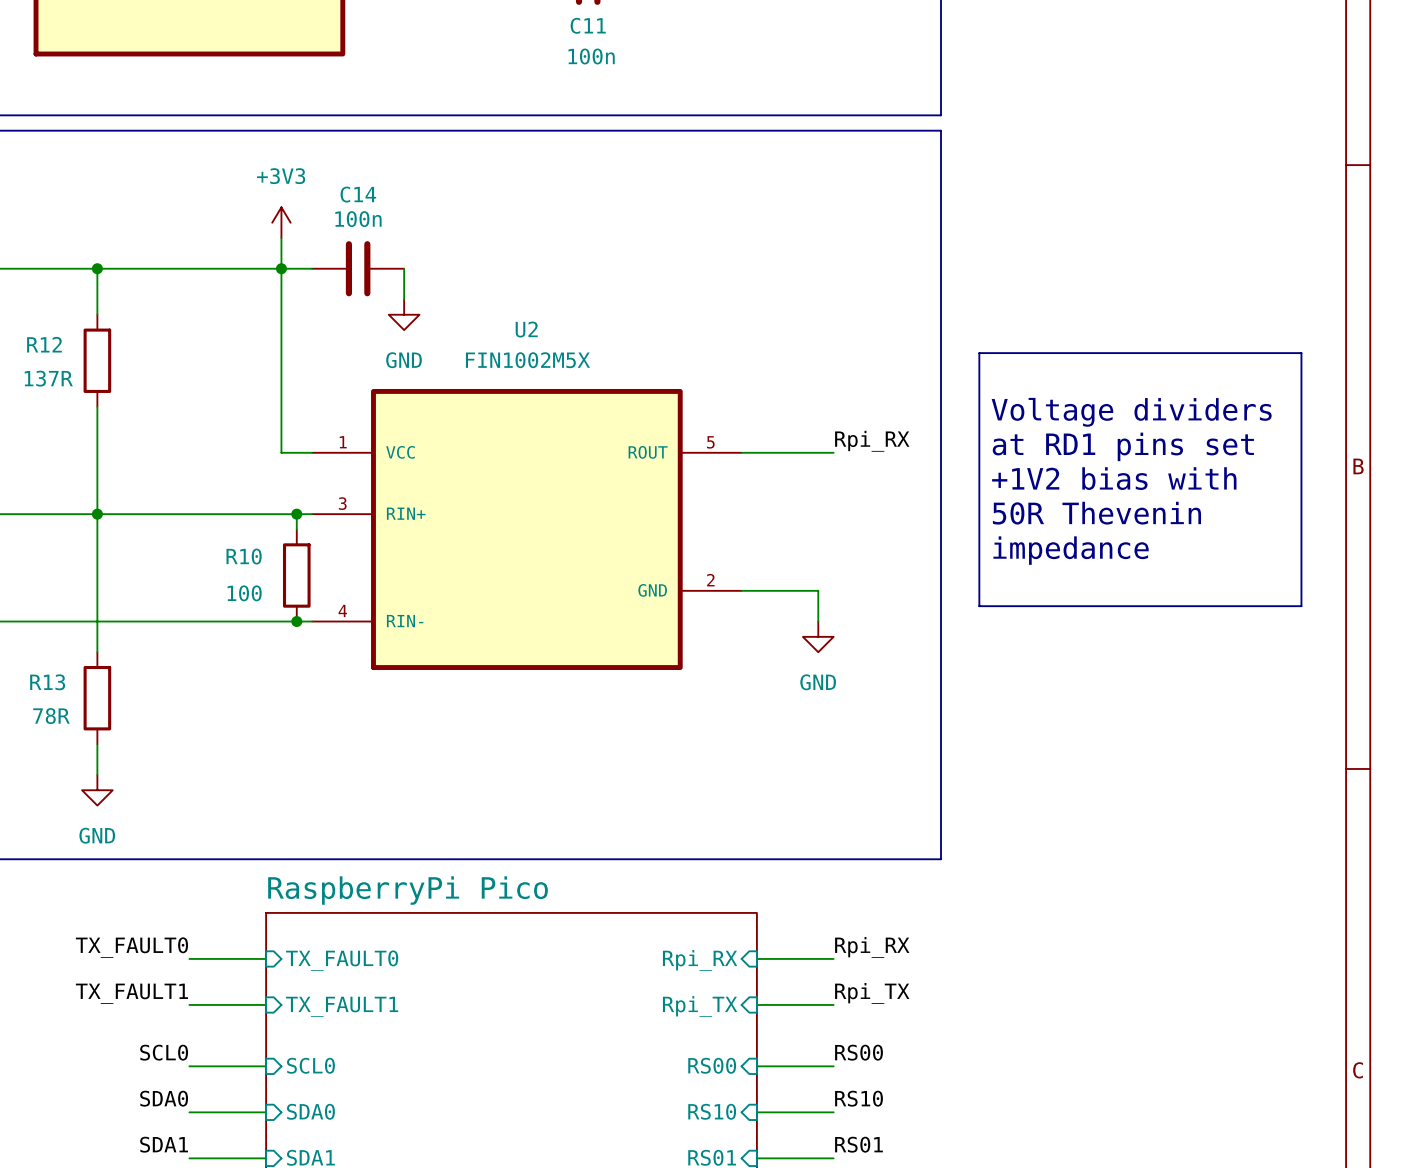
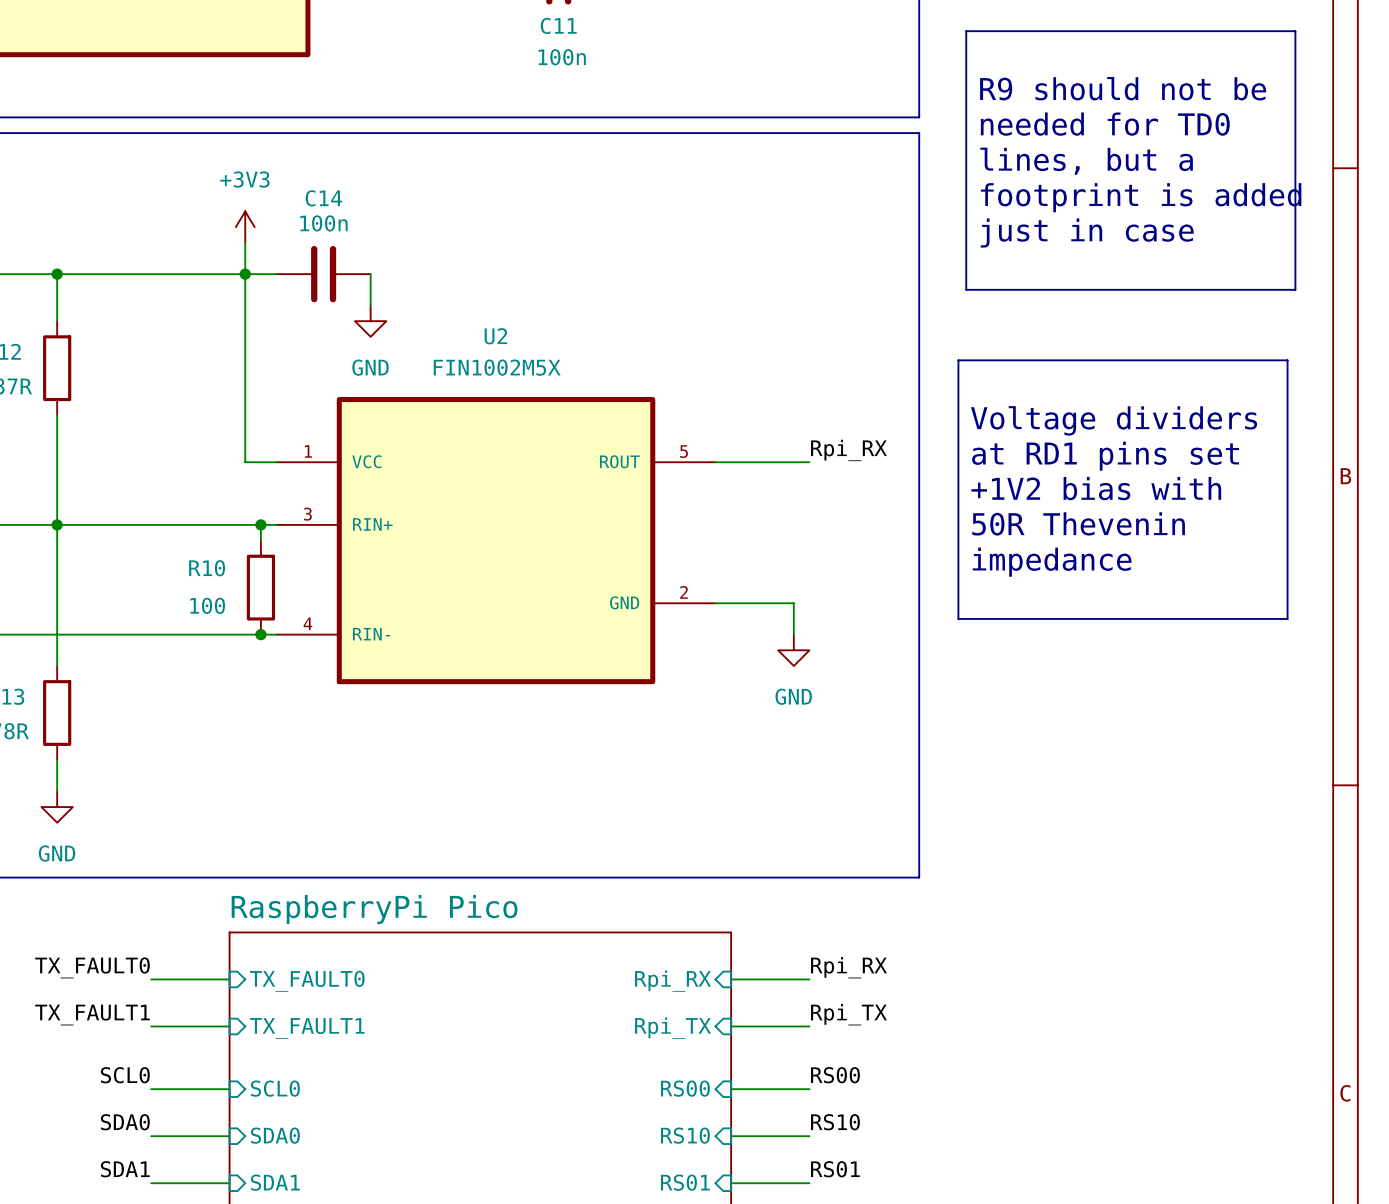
line: none -> (966, 31) (1295, 31) (1295, 289) (966, 289) (966, 31)
text: none -> R9 should not be (1123, 88)
text: none -> needed for TD0 (1105, 124)
text: none -> lines, but a (1086, 161)
text: none -> footprint is added (1141, 197)
text: none -> just in case (1087, 233)

